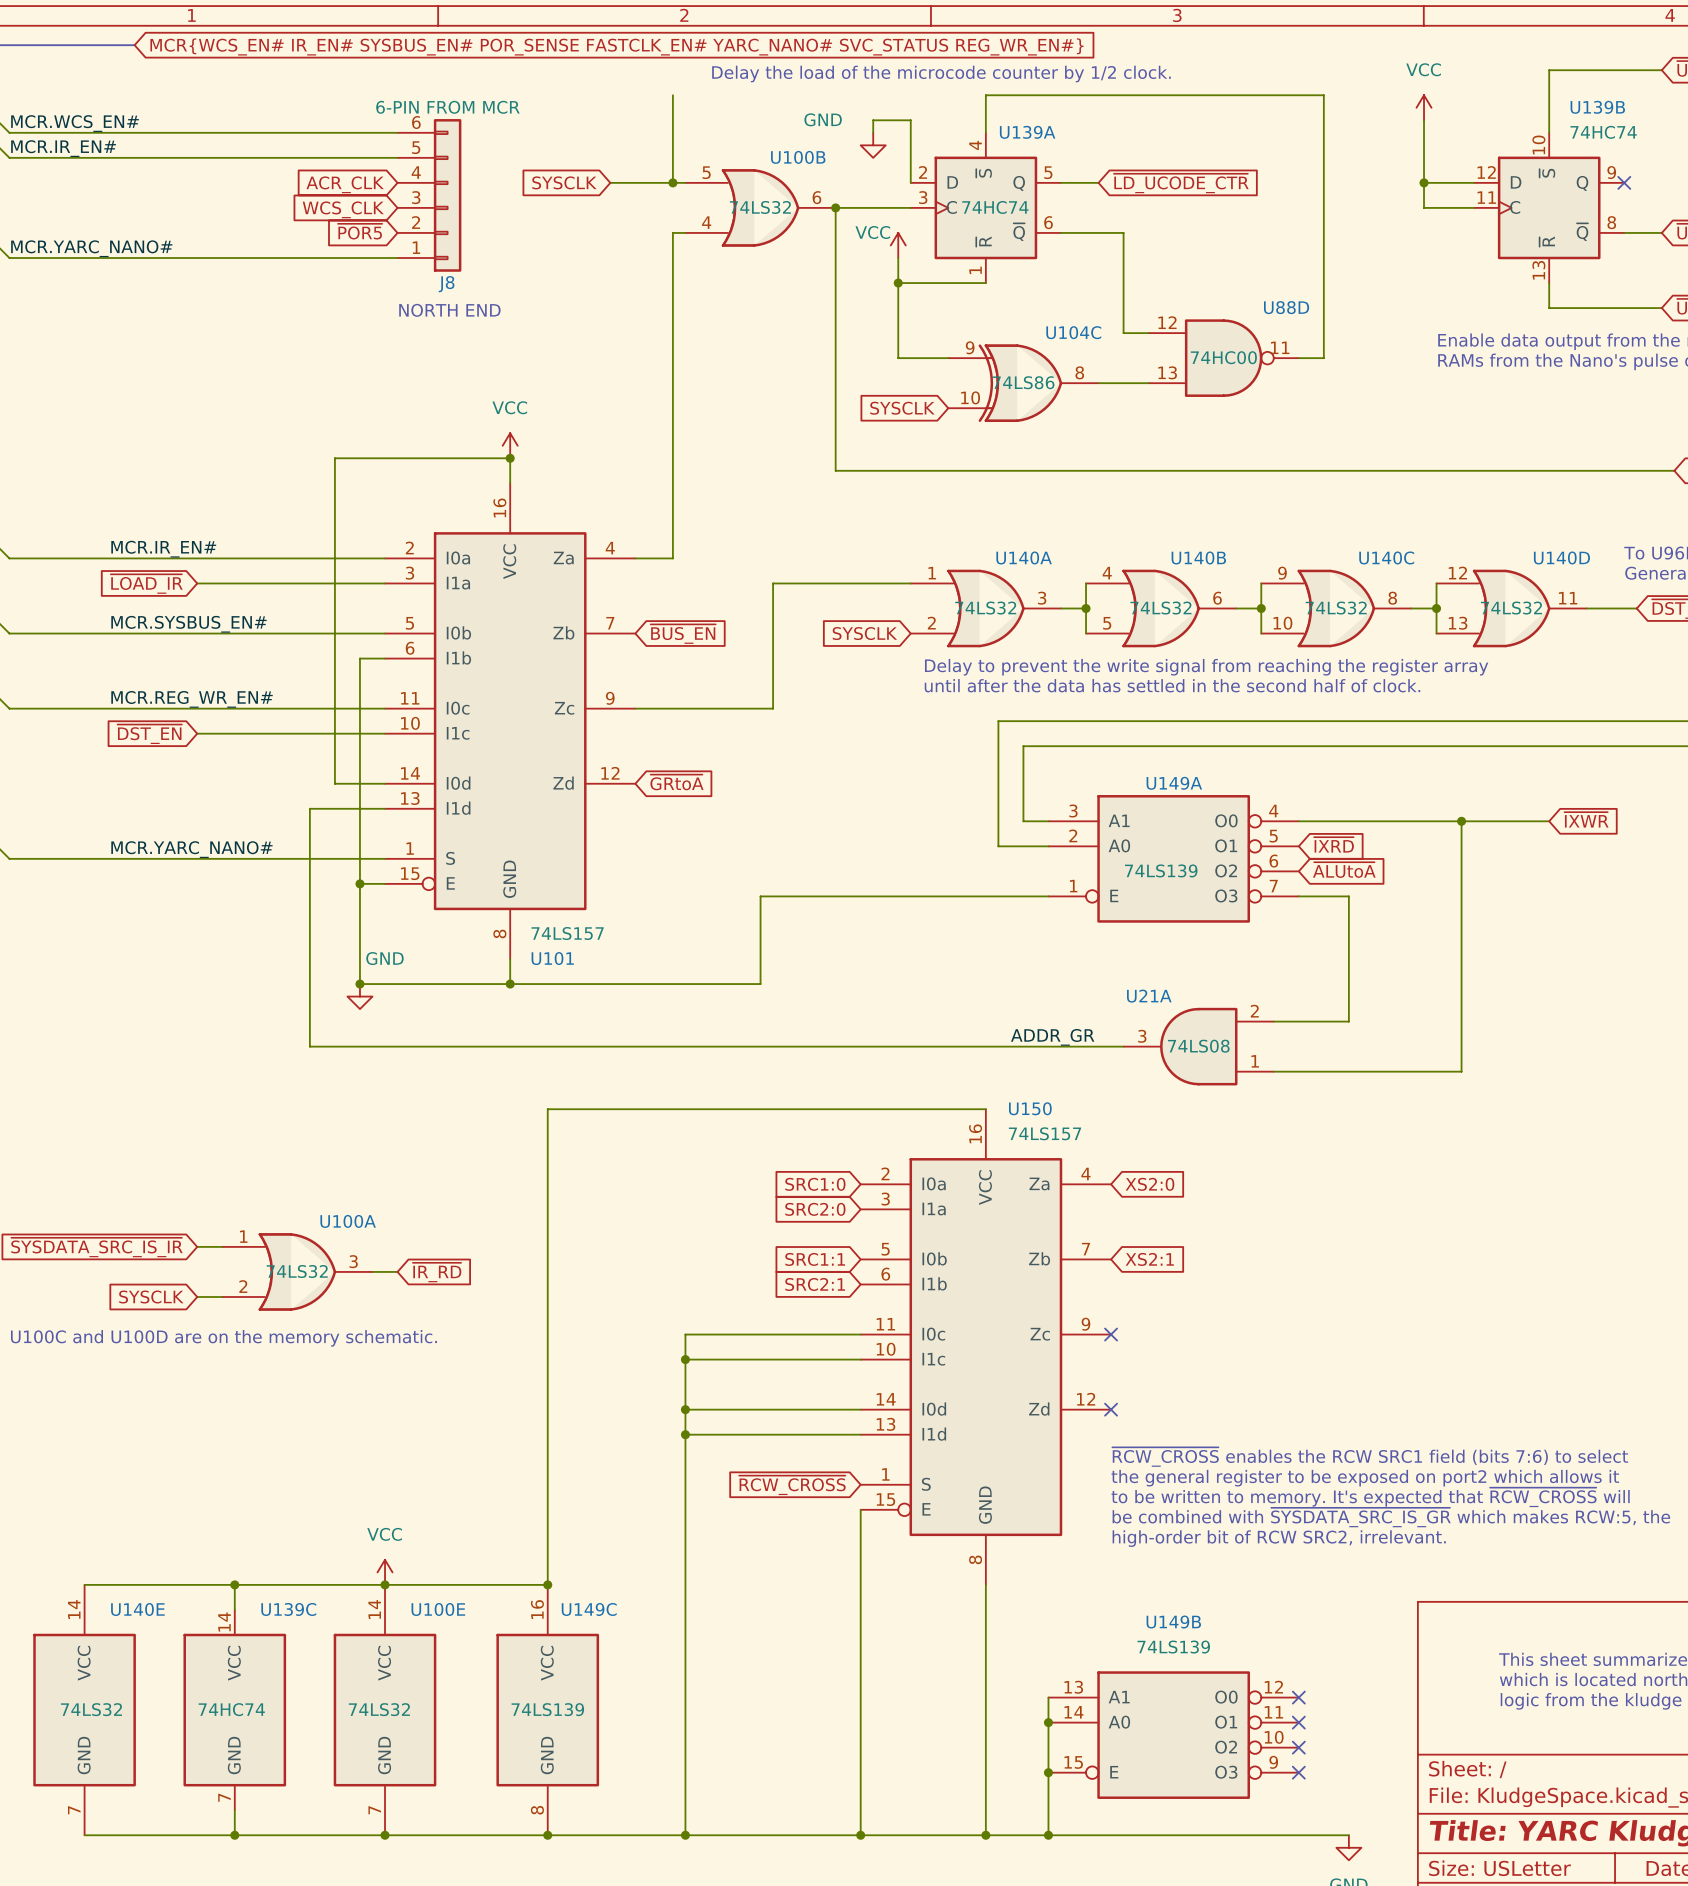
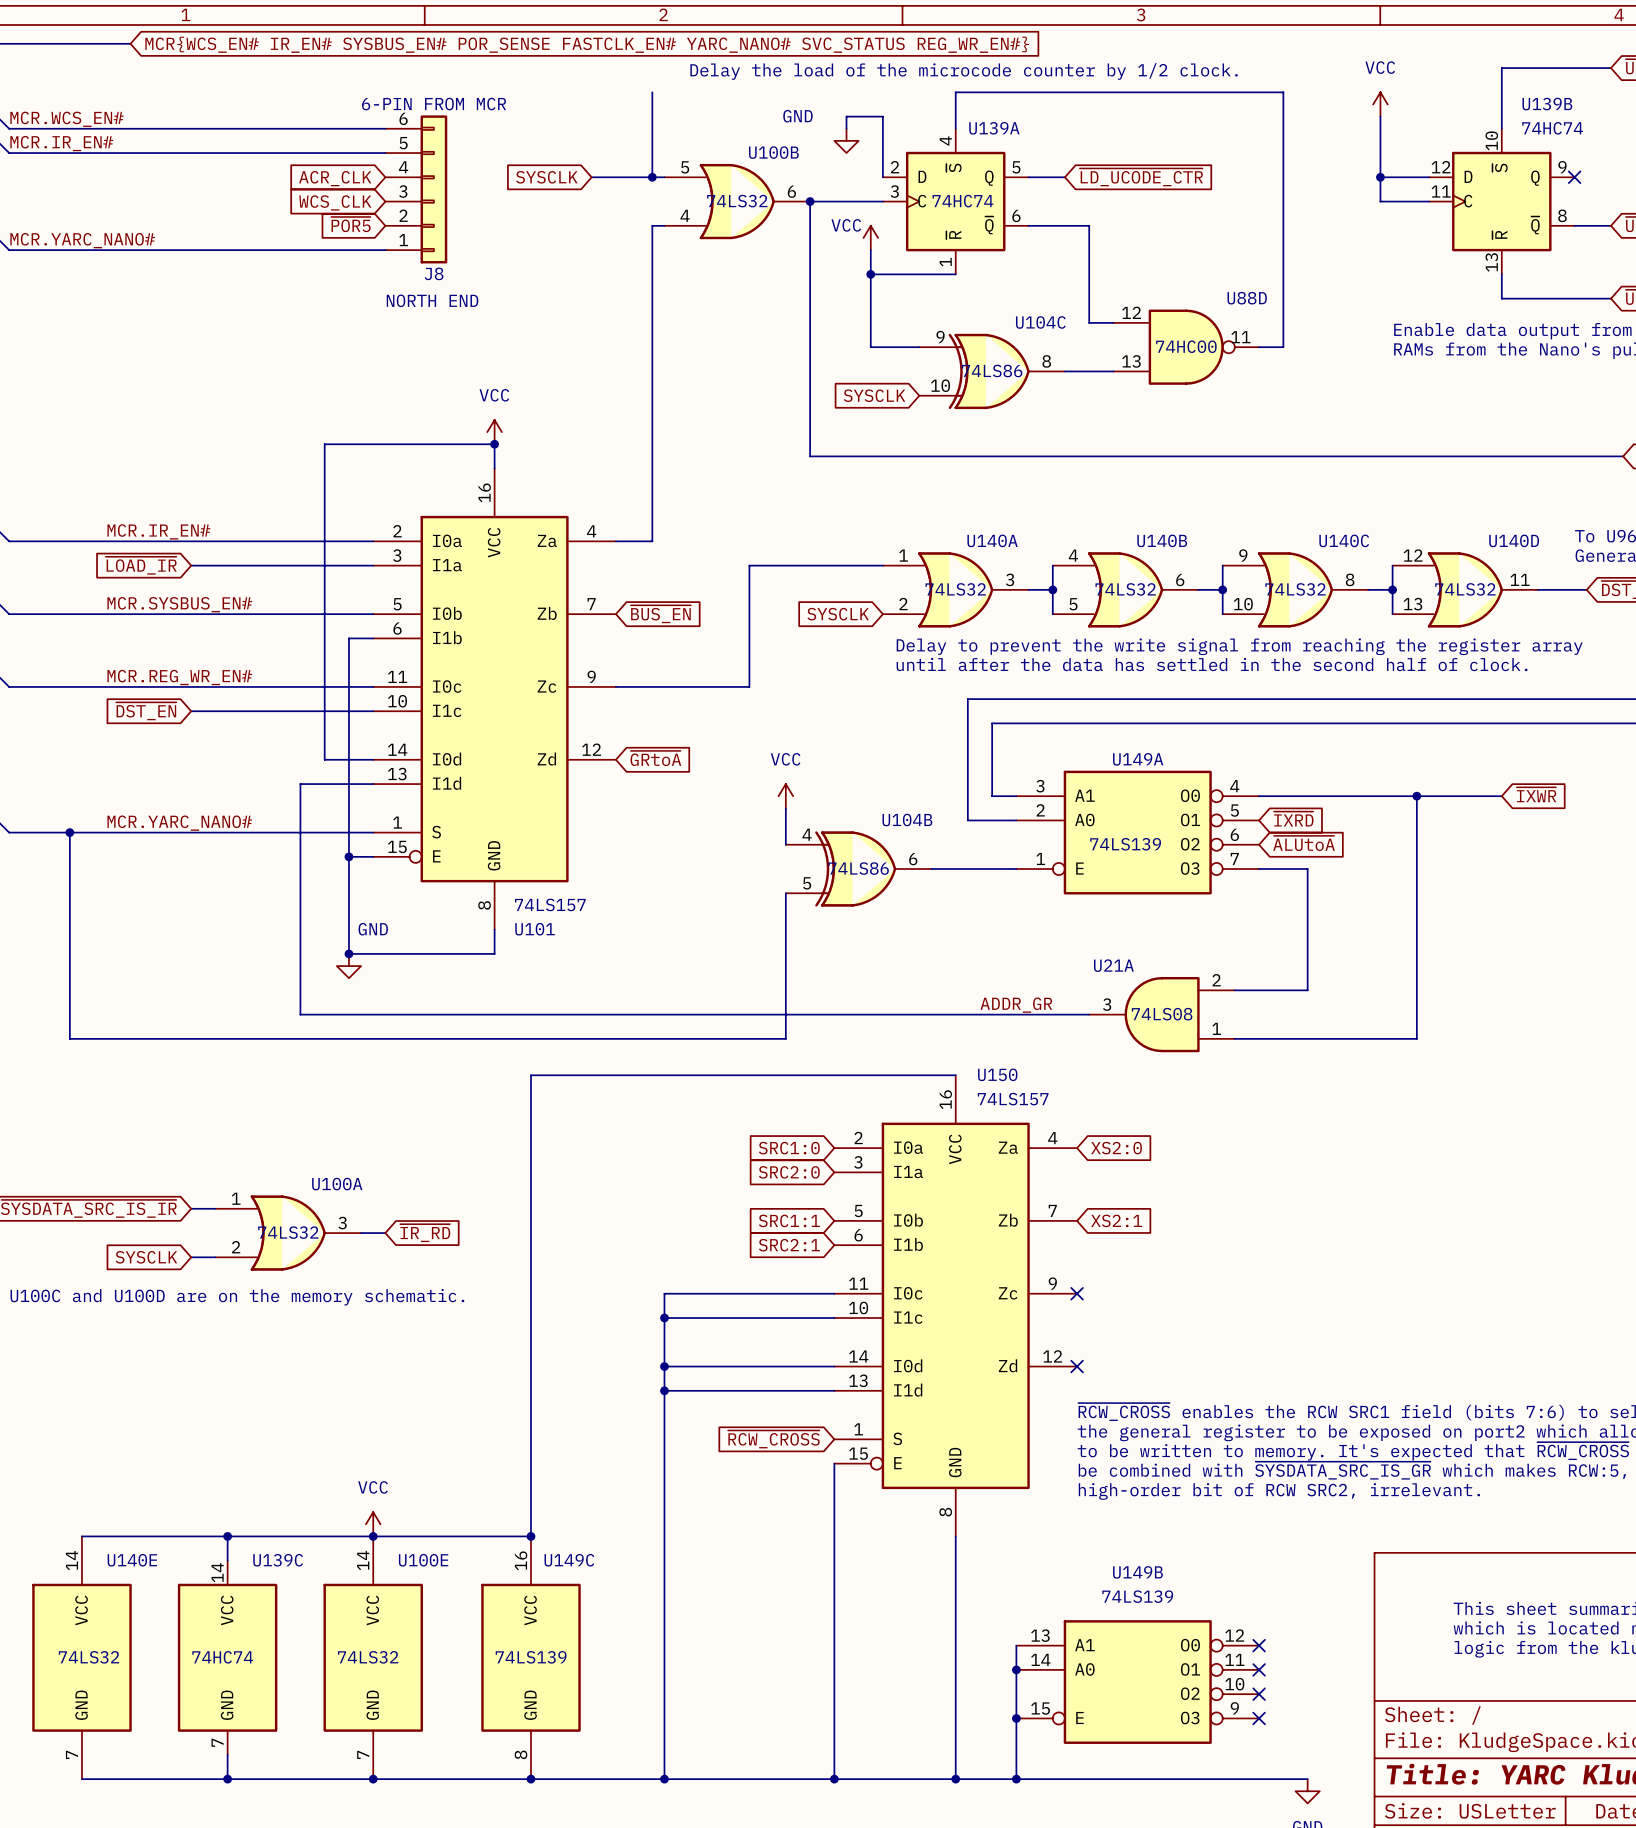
power symbol: none -> VCC (785, 796)
wire: none -> (785, 808) (785, 844)
wire: none -> (69, 832) (69, 1038) (785, 1038) (785, 893)
junction: none -> (69, 832)
U104B: none -> 74LS86 (858, 869)
wire: (960, 896) (760, 896) (760, 984) (510, 984) -> none
junction: (510, 984) -> none

